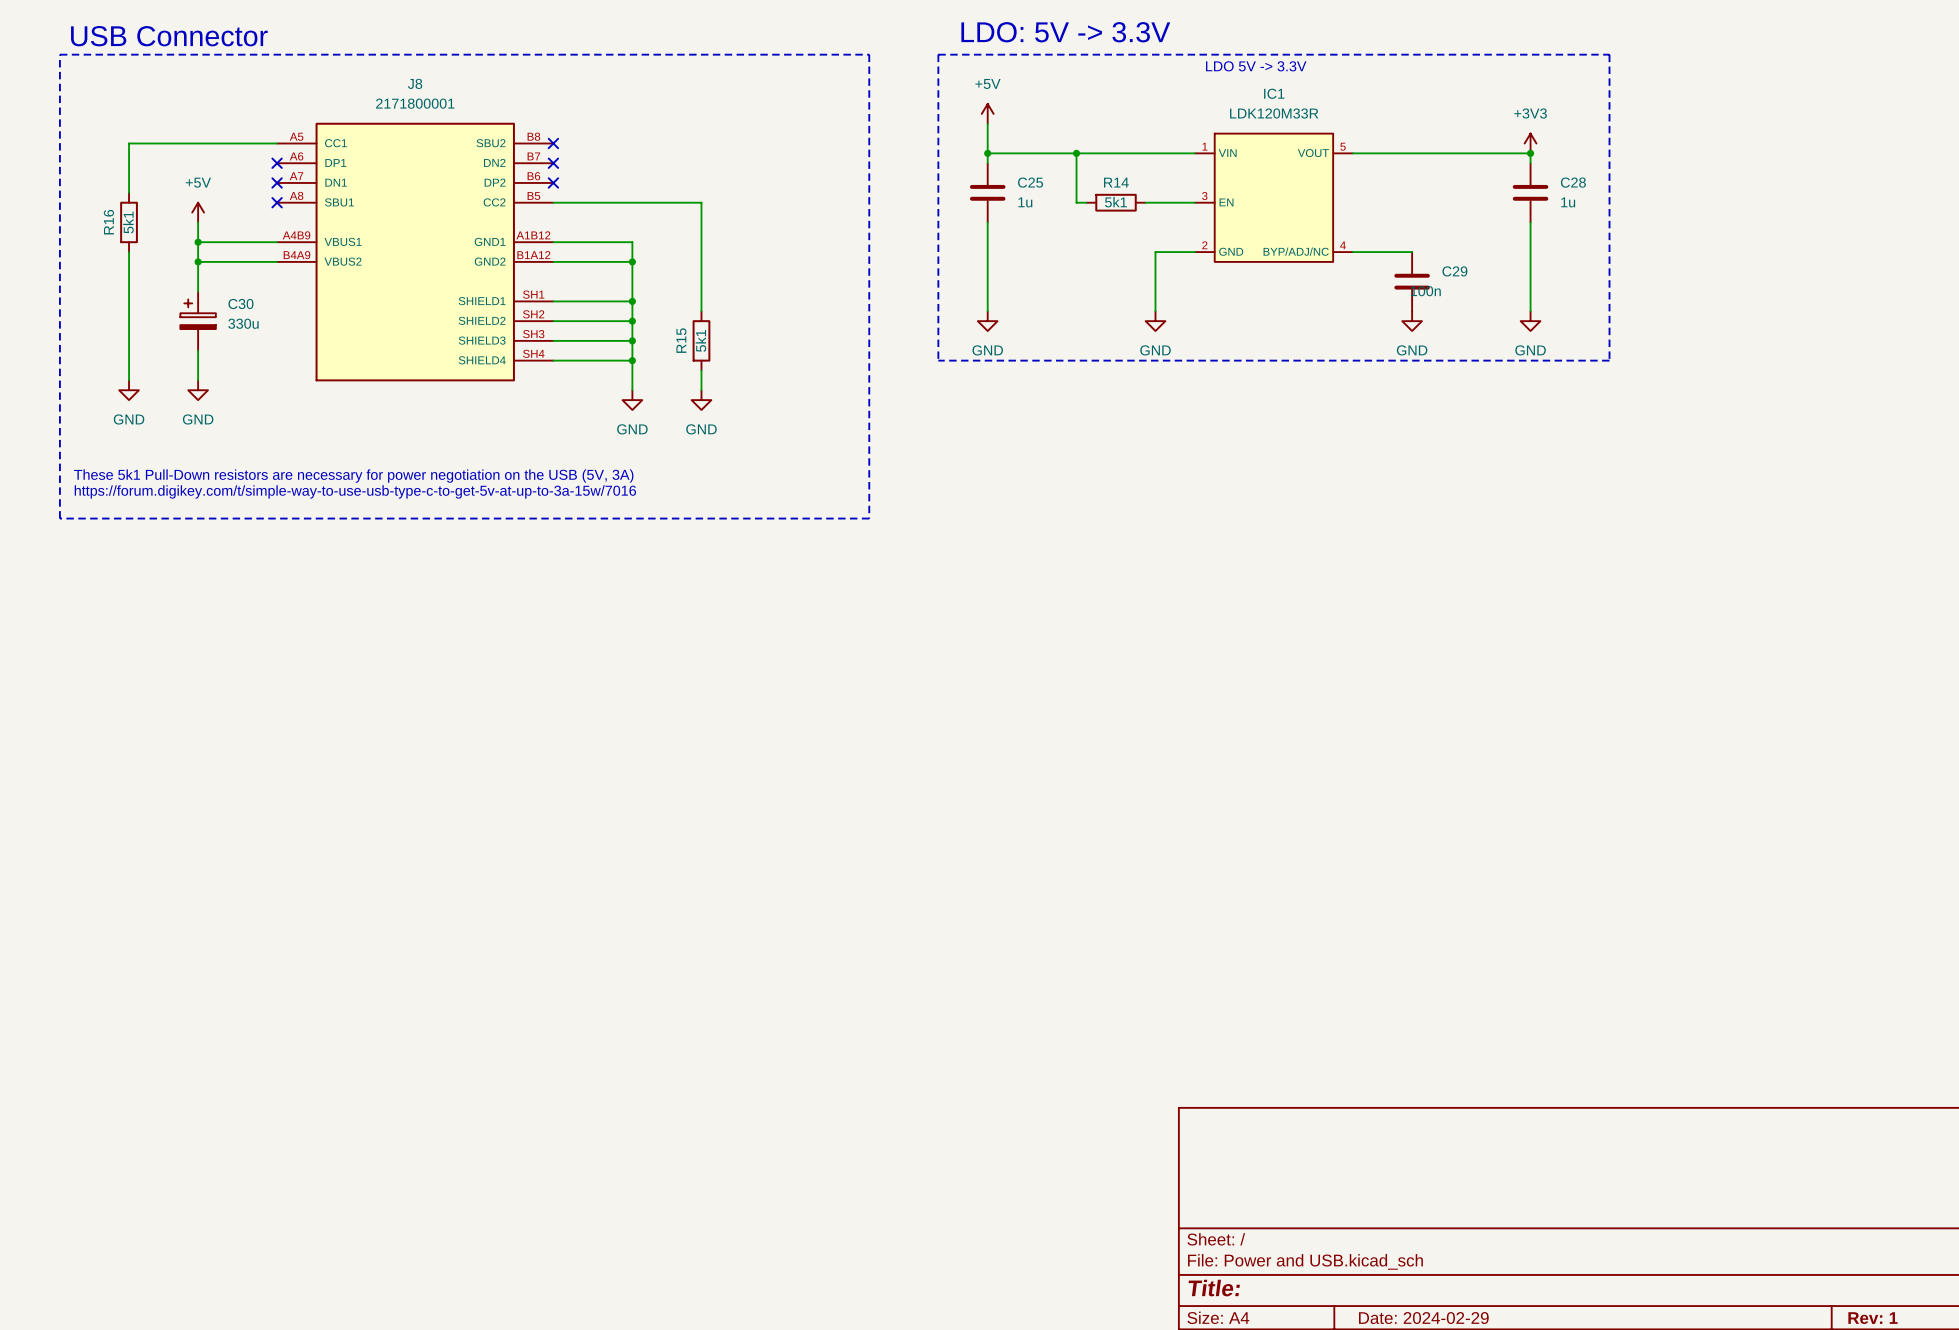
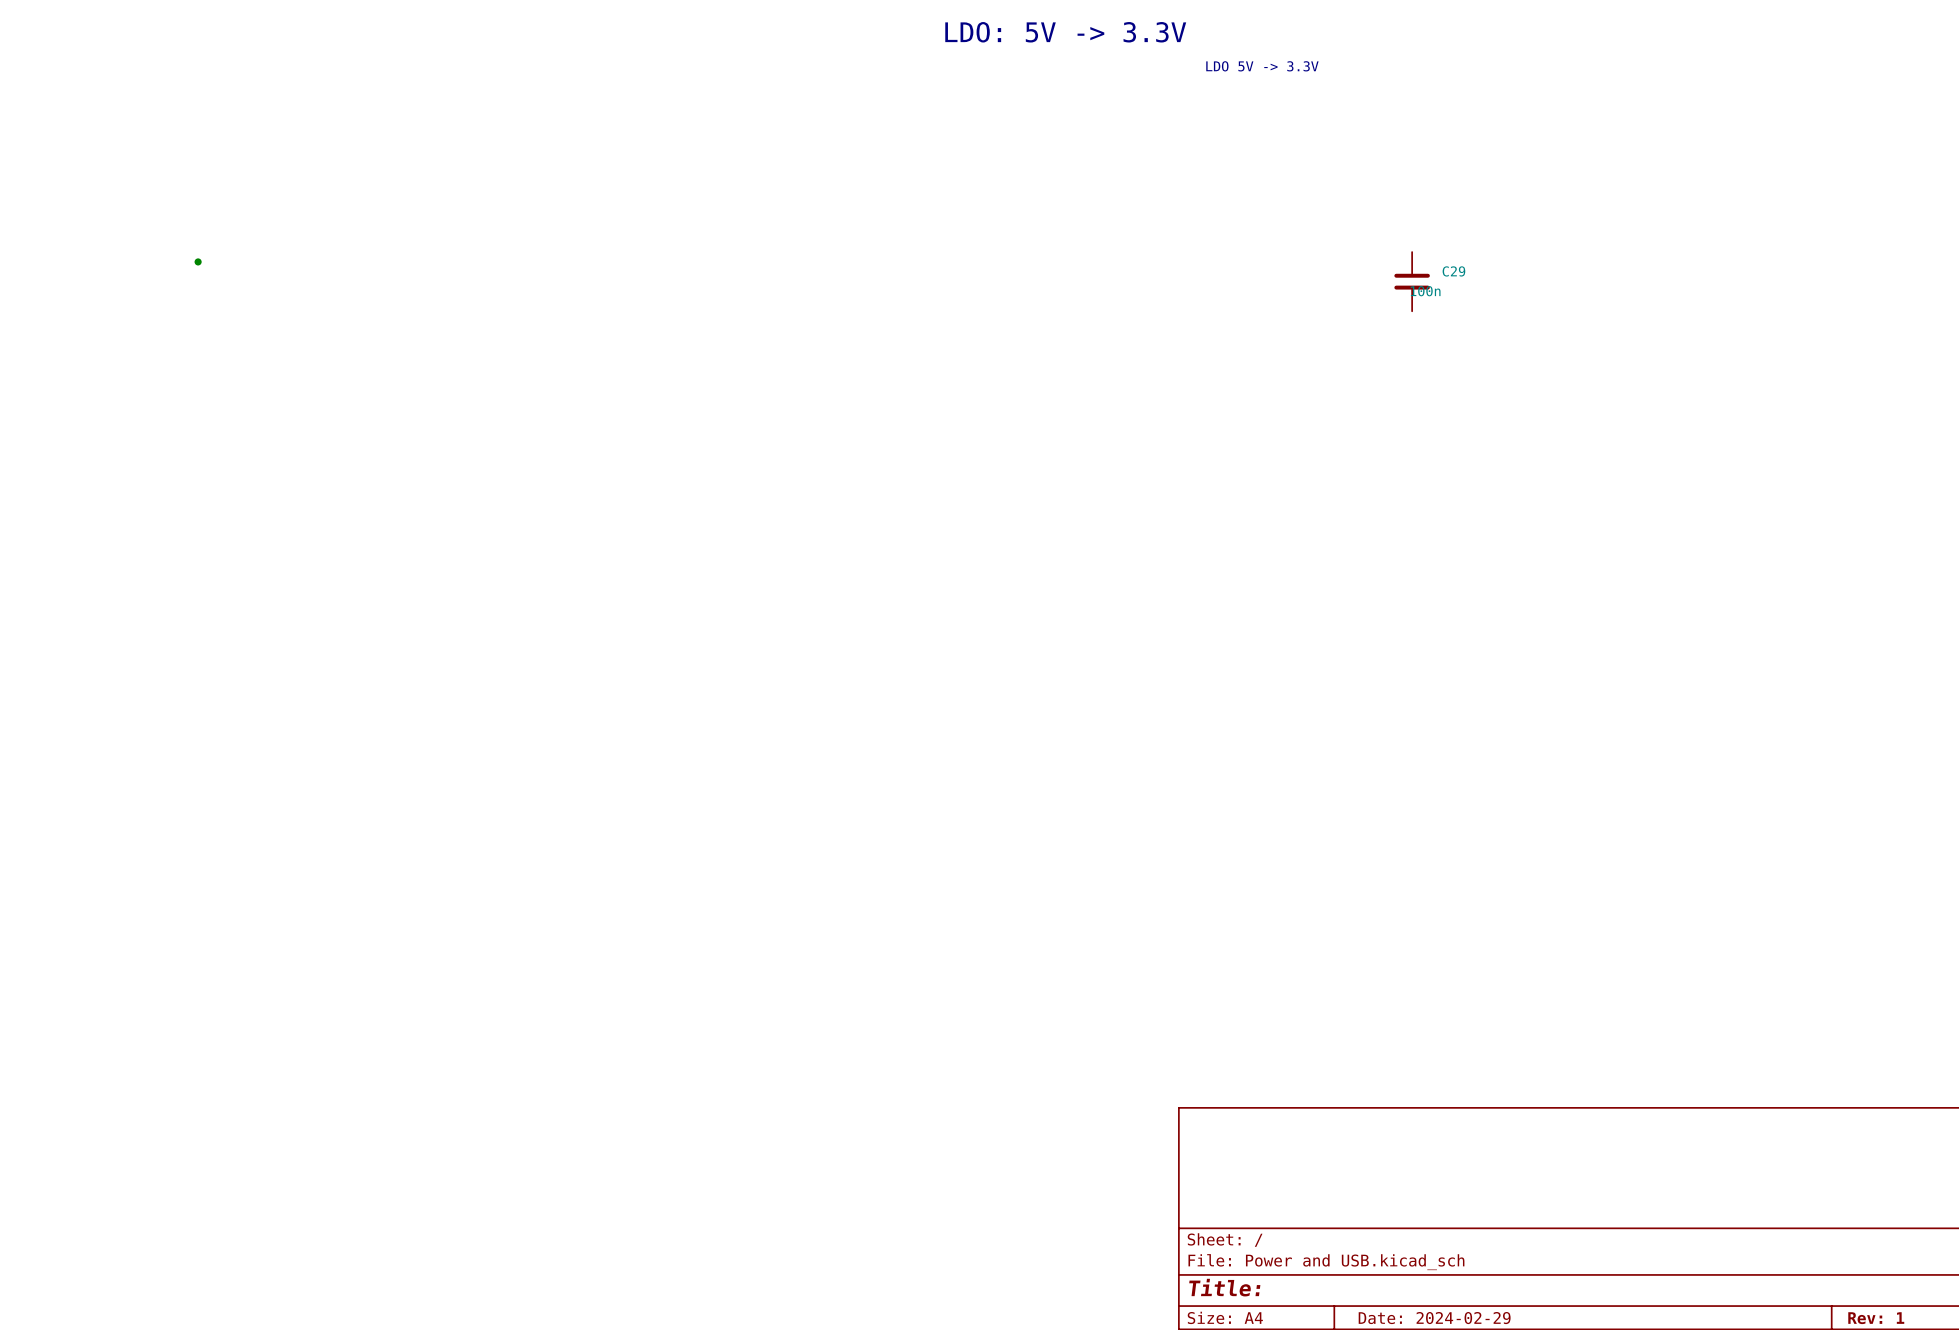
text: USB Connector (169, 36) -> none
line: (59, 54) (869, 54) (869, 518) (59, 518) (59, 54) -> none
line: (938, 54) (938, 360) (1609, 360) (1609, 54) (938, 54) -> none
power symbol: +5V (987, 113) -> none
wire: (987, 123) (987, 163) -> none
wire: (277, 143) (129, 143) (129, 192) -> none
no-connect mark: (553, 143) -> none
power symbol: +3V3 (1530, 143) -> none
wire: (987, 153) (1194, 153) -> none
junction: (987, 153) -> none
wire: (1076, 153) (1076, 202) (1086, 202) -> none
junction: (1076, 153) -> none
wire: (1352, 153) (1530, 153) (1530, 163) -> none
junction: (1530, 153) -> none
no-connect mark: (277, 163) -> none
no-connect mark: (553, 163) -> none
no-connect mark: (277, 182) -> none
no-connect mark: (553, 182) -> none
C25: 1u (987, 192) -> none
C28: 1u (1530, 192) -> none
IC1: LDK120M33R (1273, 197) -> none
no-connect mark: (277, 202) -> none
wire: (553, 202) (701, 202) (701, 311) -> none
R14: 5k1 (1116, 202) -> none
wire: (1145, 202) (1194, 202) -> none
power symbol: +5V (198, 212) -> none
R16: 5k1 (129, 222) -> none
wire: (198, 222) (198, 291) -> none
wire: (987, 222) (987, 311) -> none
wire: (1530, 222) (1530, 311) -> none
wire: (198, 242) (277, 242) -> none
junction: (198, 242) -> none
wire: (553, 242) (632, 242) (632, 390) -> none
wire: (129, 252) (129, 380) -> none
J8: 2171800001 (415, 252) -> none
wire: (1194, 252) (1155, 252) (1155, 311) -> none
wire: (1352, 252) (1412, 252) -> none
wire: (198, 261) (277, 261) -> none
wire: (553, 261) (632, 261) -> none
junction: (632, 261) -> none
wire: (553, 301) (632, 301) -> none
junction: (632, 301) -> none
C30: 330u (198, 321) -> none
wire: (553, 321) (632, 321) -> none
junction: (632, 321) -> none
power symbol: GND (987, 321) -> none
power symbol: GND (1155, 321) -> none
power symbol: GND (1412, 321) -> none
power symbol: GND (1530, 321) -> none
wire: (553, 340) (632, 340) -> none
junction: (632, 340) -> none
R15: 5k1 (701, 340) -> none
wire: (198, 350) (198, 380) -> none
wire: (553, 360) (632, 360) -> none
junction: (632, 360) -> none
wire: (701, 370) (701, 390) -> none
power symbol: GND (129, 390) -> none
power symbol: GND (198, 390) -> none
power symbol: GND (632, 400) -> none
power symbol: GND (701, 400) -> none
text: These 5k1 Pull-Down resistors are necessary for power negotiation on the USB (5V, 3A) (353, 476) -> none
text: https://forum.digikey.com/t/simple-way-to-use-usb-type-c-to-get-5v-at-up-to-3a-15w/7016 (355, 491) -> none

